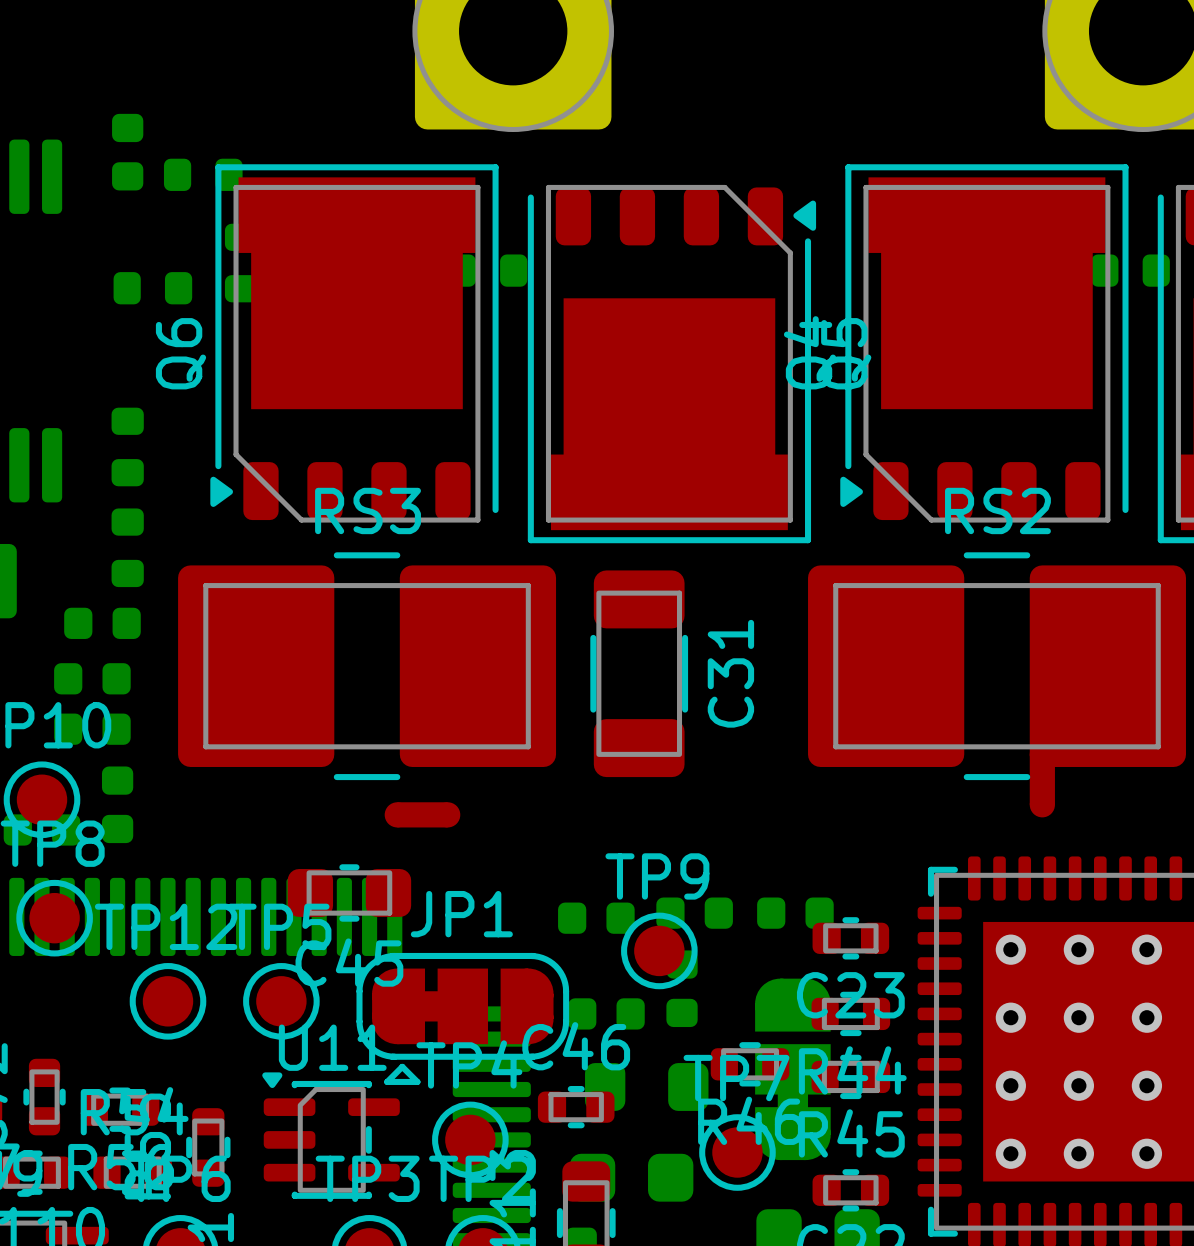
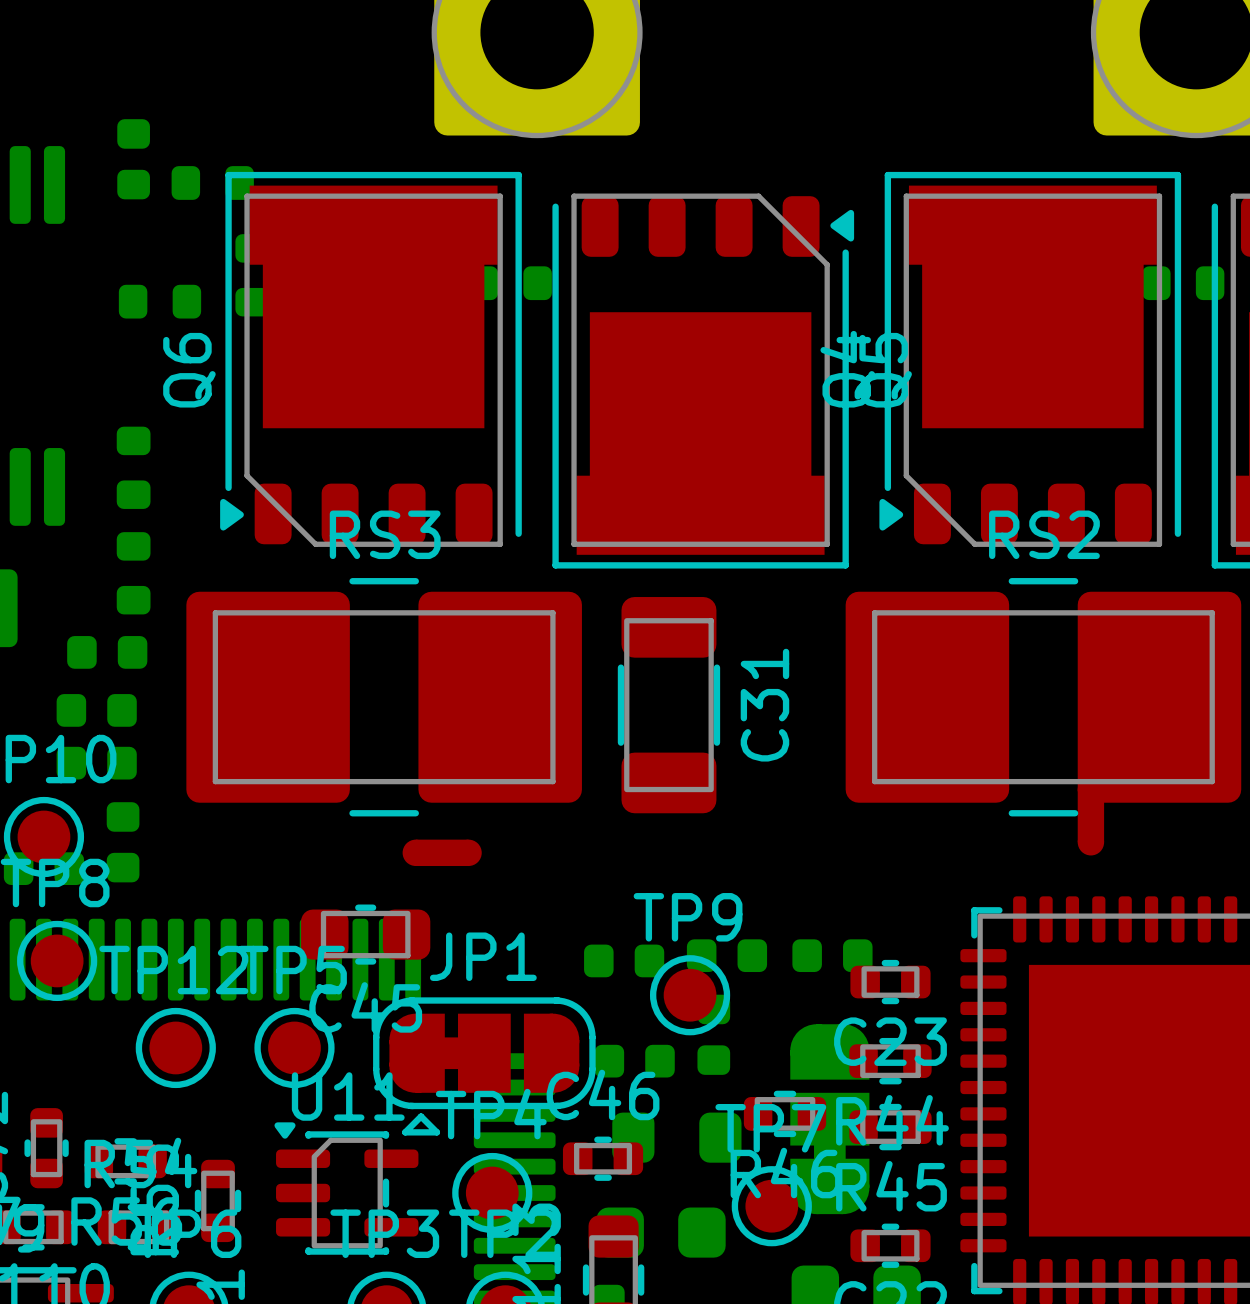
via: (1010, 949) -> none
via: (1078, 949) -> none
via: (1146, 949) -> none
via: (1010, 1017) -> none
via: (1078, 1017) -> none
via: (1146, 1017) -> none
via: (1010, 1085) -> none
via: (1078, 1085) -> none
via: (1146, 1085) -> none
via: (1010, 1153) -> none
via: (1078, 1153) -> none
via: (1146, 1153) -> none

